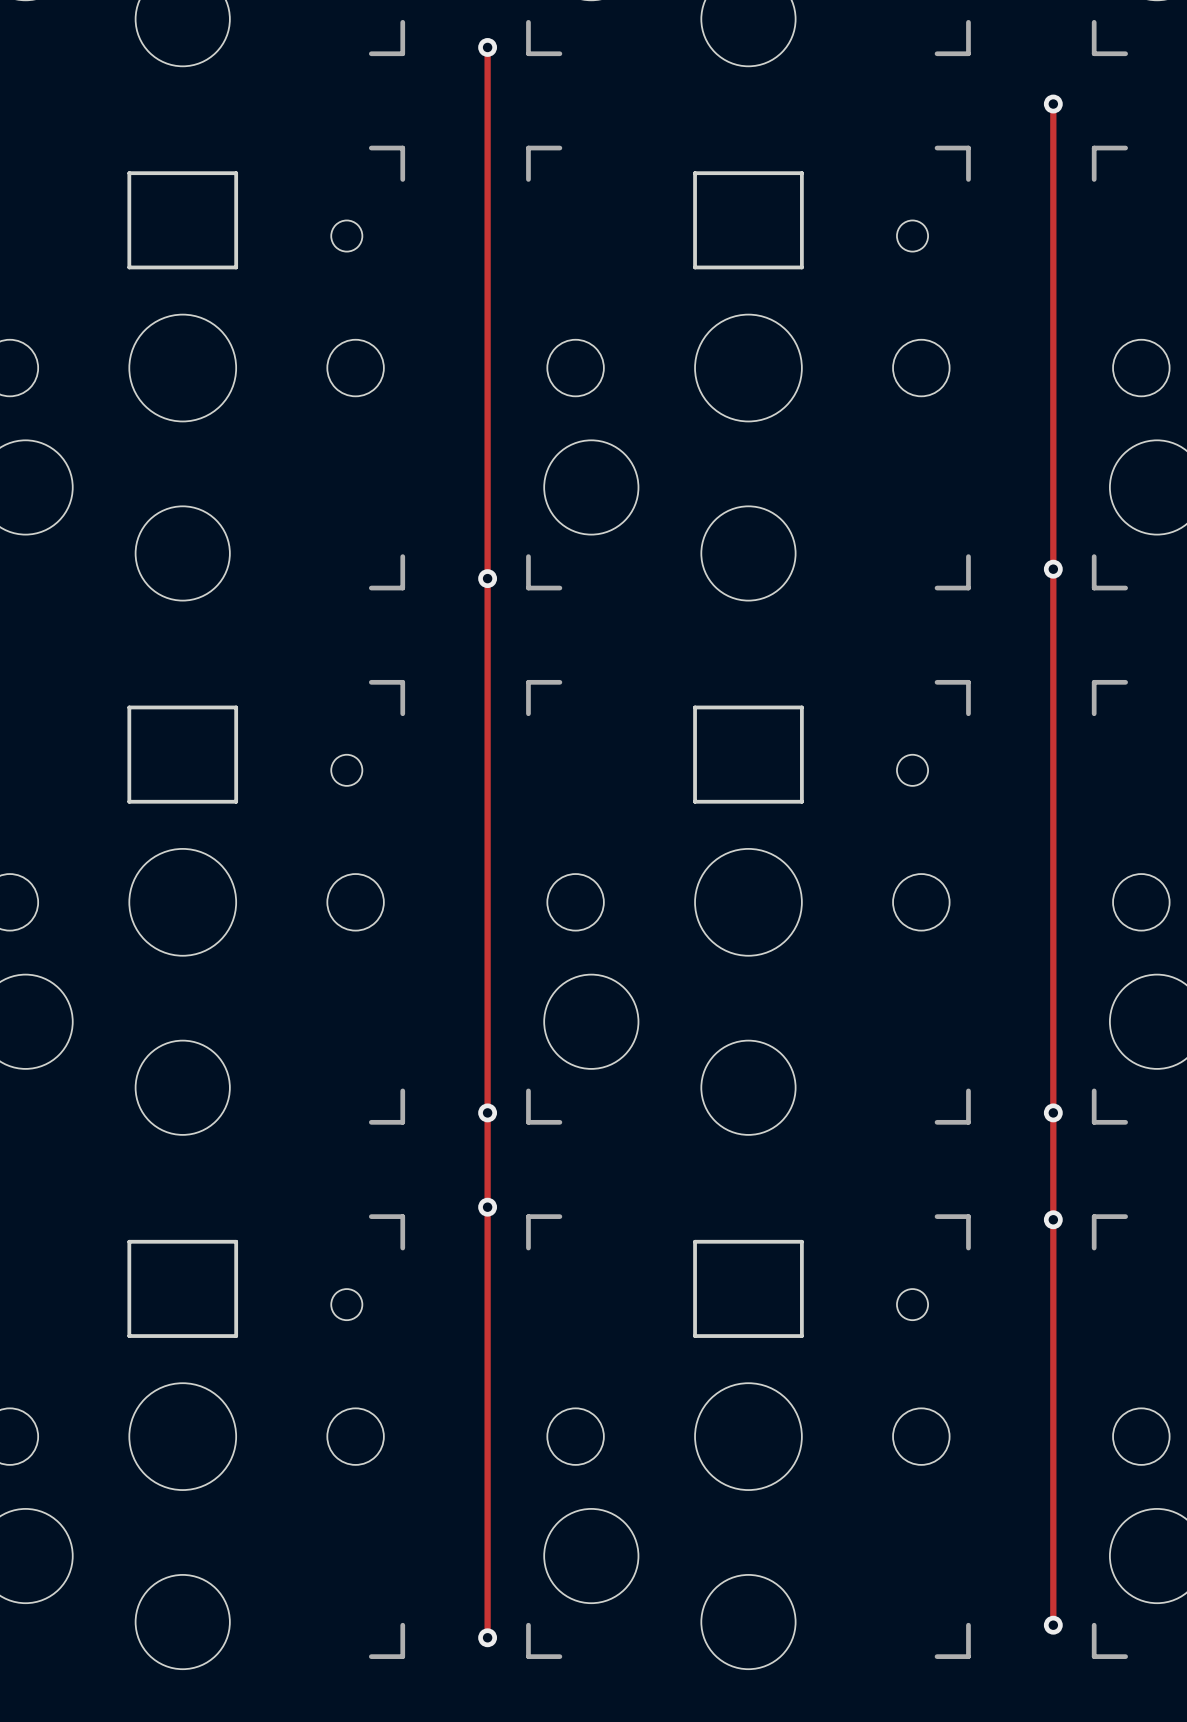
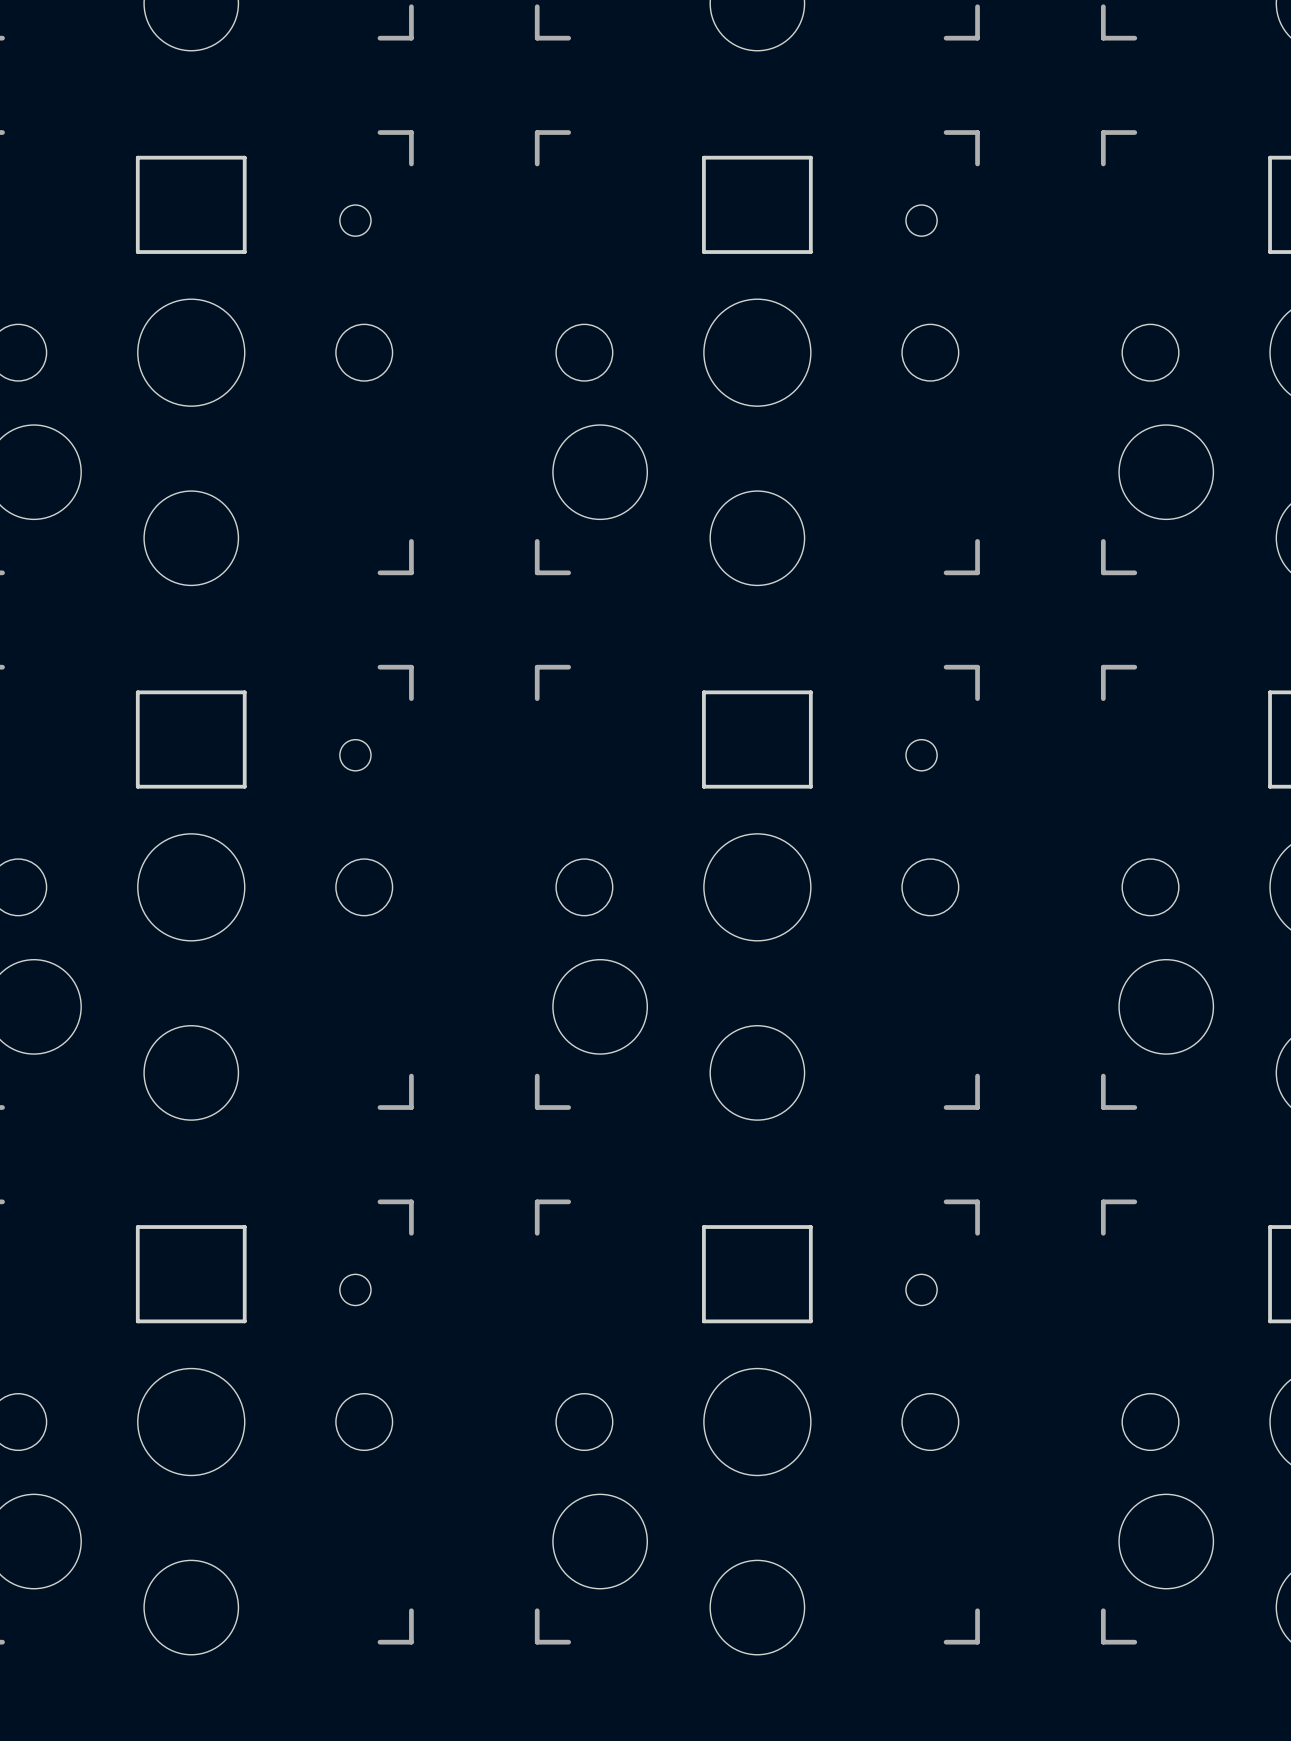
track: (487, 47) (487, 1637) -> none
via: (487, 47) -> none
track: (1053, 104) (1053, 1625) -> none
via: (1053, 104) -> none
via: (1053, 569) -> none
via: (487, 578) -> none
via: (487, 1112) -> none
via: (1053, 1112) -> none
via: (487, 1207) -> none
via: (1053, 1219) -> none
via: (1053, 1625) -> none
via: (487, 1637) -> none

